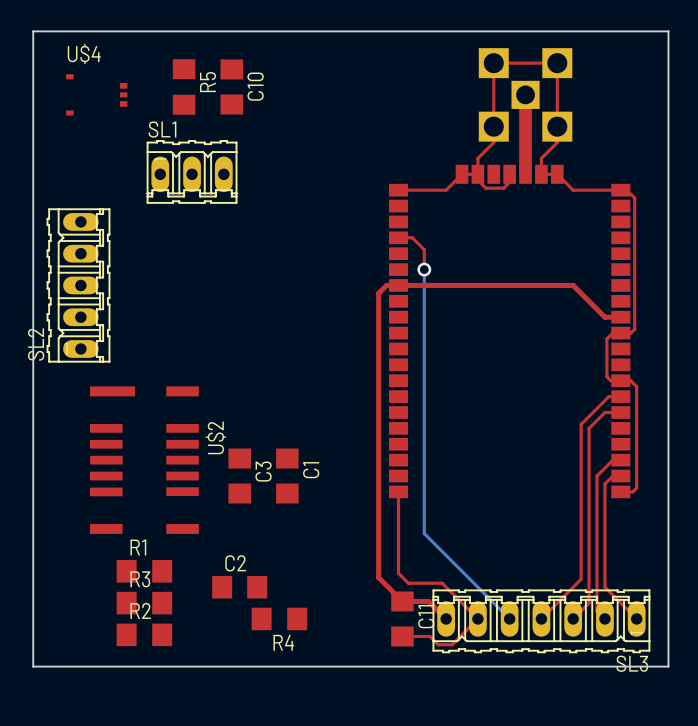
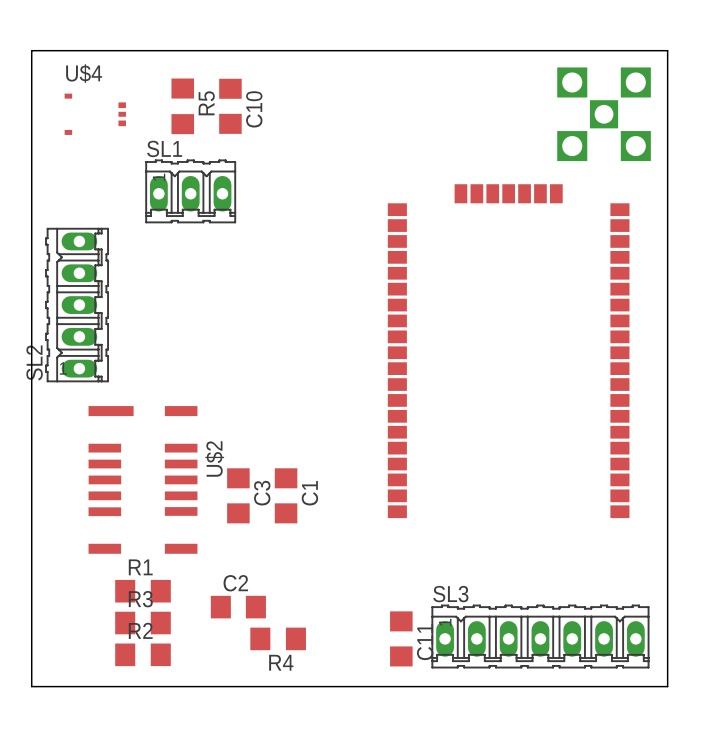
top track: (525, 94) (525, 174) -> none
part position: (525, 94) -> (604, 114)
top track: (477, 174) (462, 174) (446, 190) (398, 190) -> none
top track: (509, 174) (509, 182) (503, 188) (485, 188) (477, 180) (477, 158) (493, 142) (493, 63) (557, 63) (557, 142) (541, 158) (541, 174) (557, 174) (573, 190) (626, 190) (634, 198) (634, 329) (630, 333) (612, 333) (606, 339) (606, 376) (610, 380) (630, 380) (636, 386) (636, 487) (632, 491) (620, 491) -> none
top track: (398, 237) (412, 237) (424, 249) (424, 269) -> none
bottom track: (424, 269) (424, 533) (509, 618) -> none
via: (424, 269) -> none
top track: (620, 317) (604, 317) (573, 285) (386, 285) (378, 293) (378, 577) (402, 601) (428, 601) (446, 618) -> none
top track: (620, 396) (608, 396) (581, 424) (581, 579) (541, 618) -> none
top track: (620, 412) (604, 412) (589, 428) (589, 603) (573, 618) -> none
top track: (620, 460) (612, 460) (597, 476) (597, 611) (604, 618) -> none
top track: (620, 476) (612, 476) (604, 483) (604, 587) (636, 618) -> none
top track: (398, 491) (398, 573) (408, 583) (442, 583) (477, 618) (452, 644) (438, 644) (429, 636) (402, 636) -> none
SL3 footprint: [432, 589, 651, 654] -> [431, 604, 650, 669]
SL3 name position: SL3 (632, 663) -> SL3 (450, 594)

